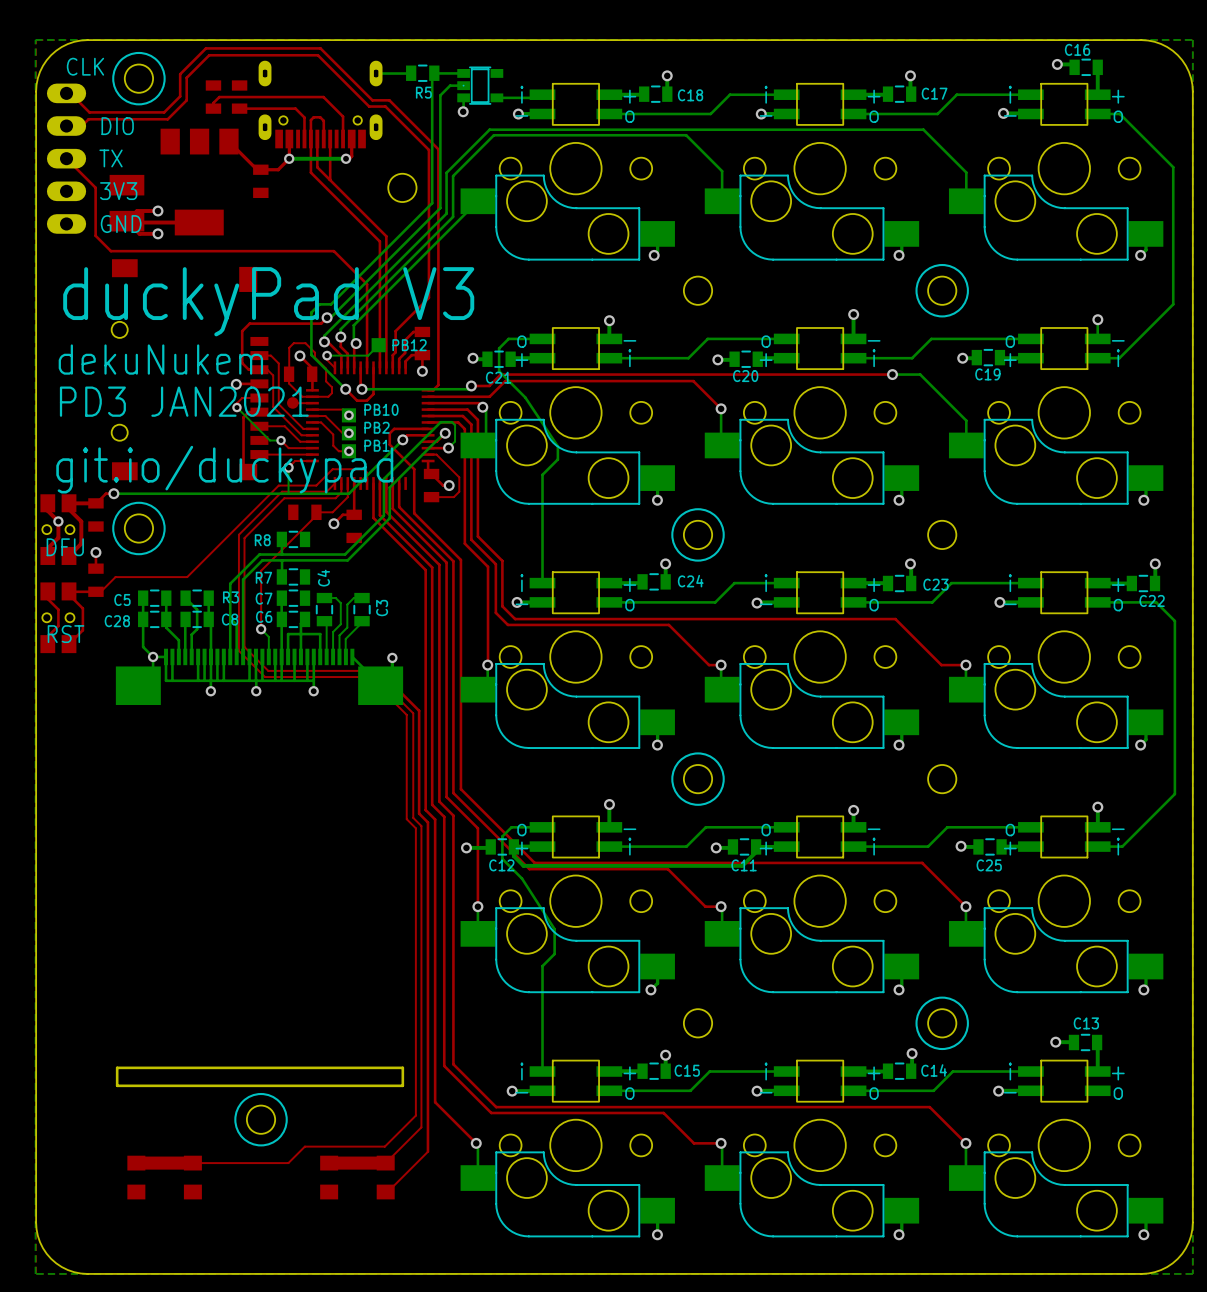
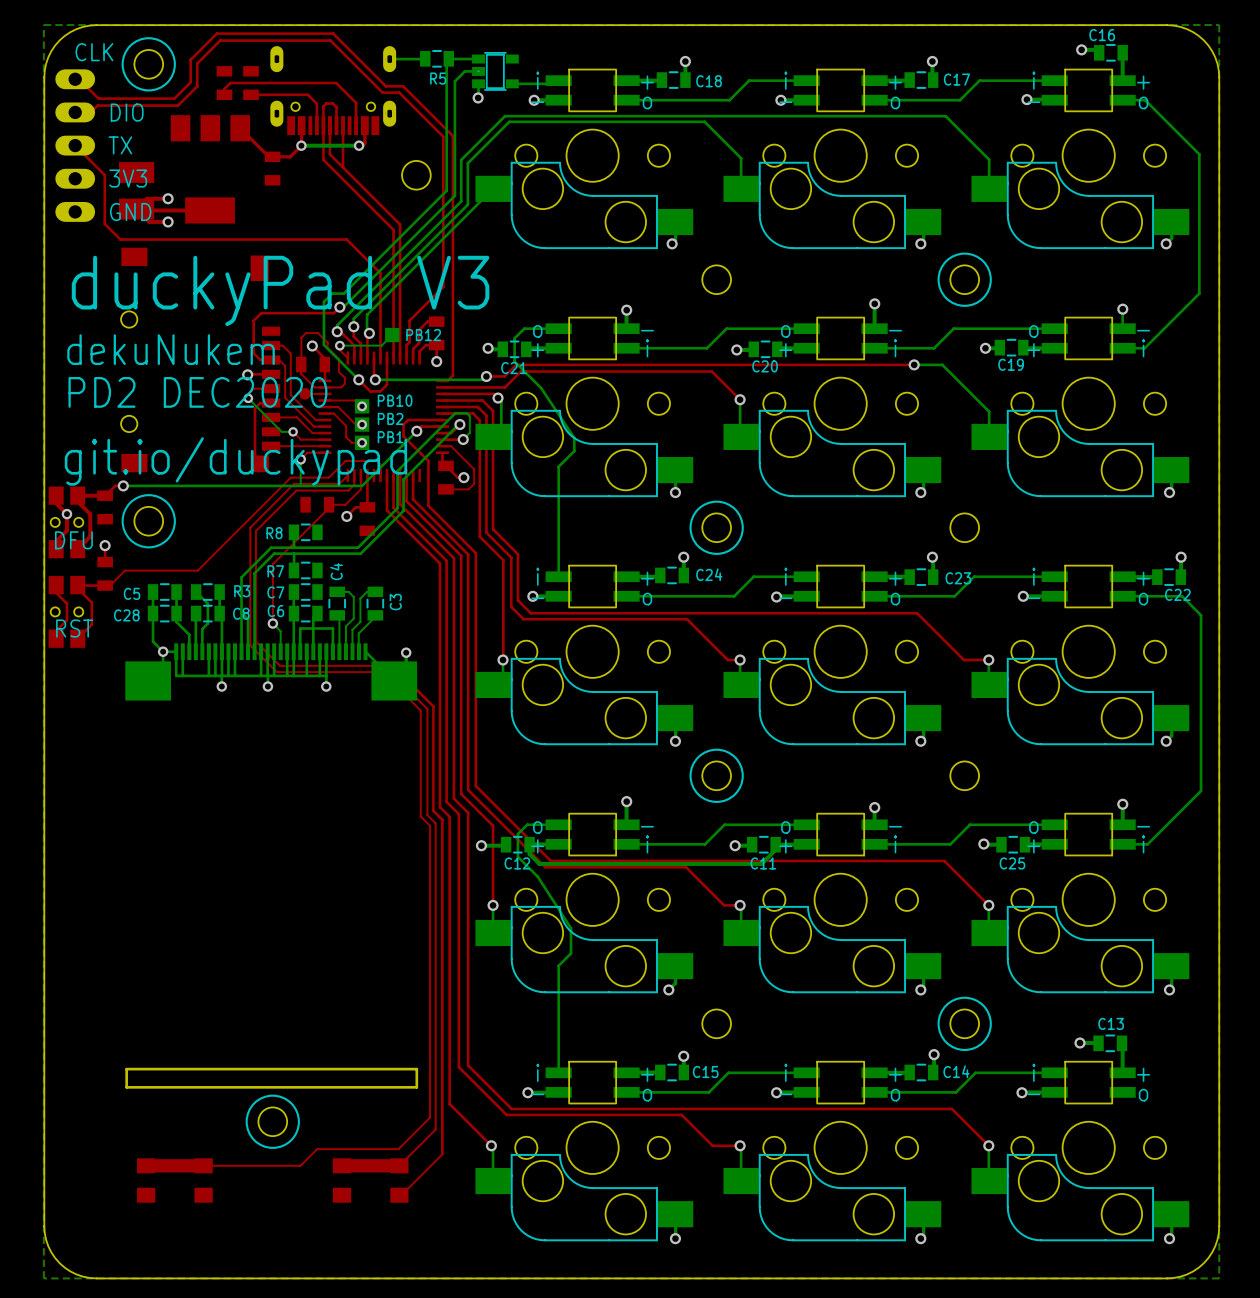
text: PD3 JAN2021 (184, 401) -> PD2 DEC2020 (197, 392)

